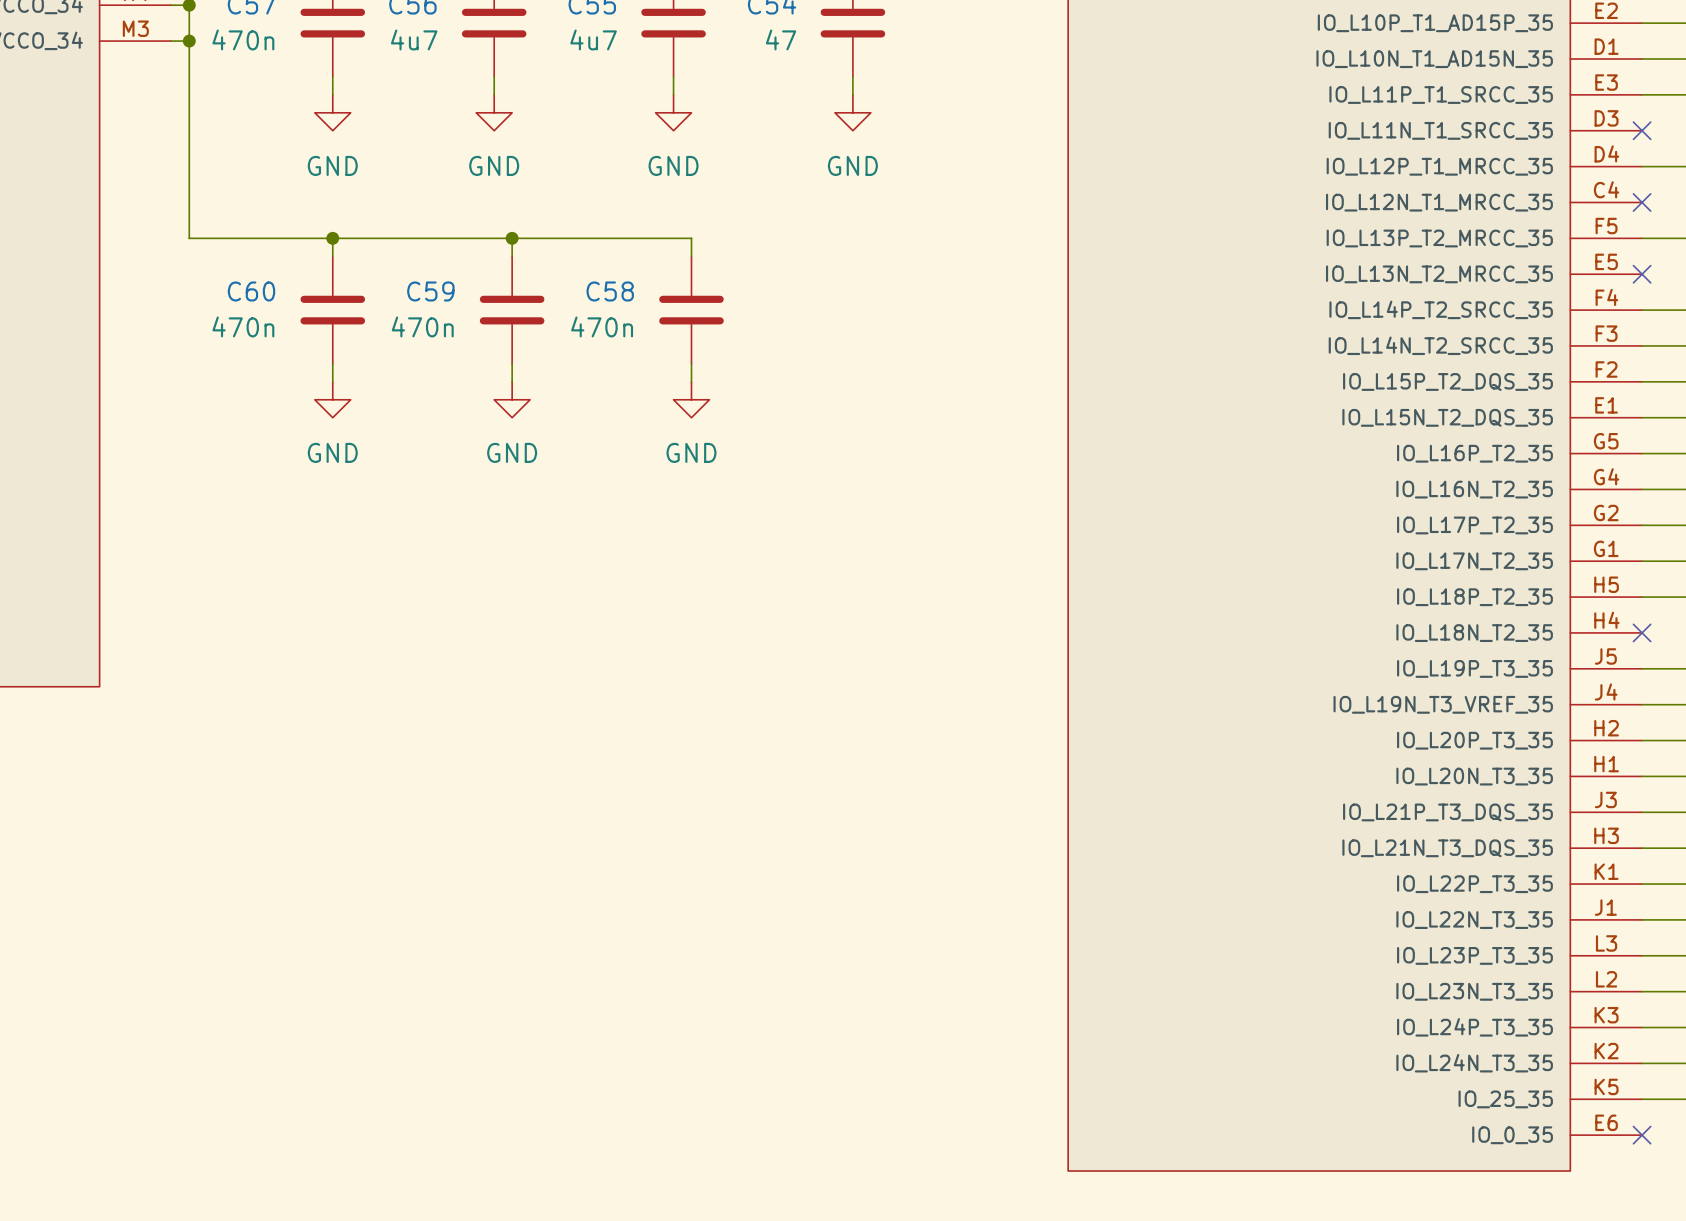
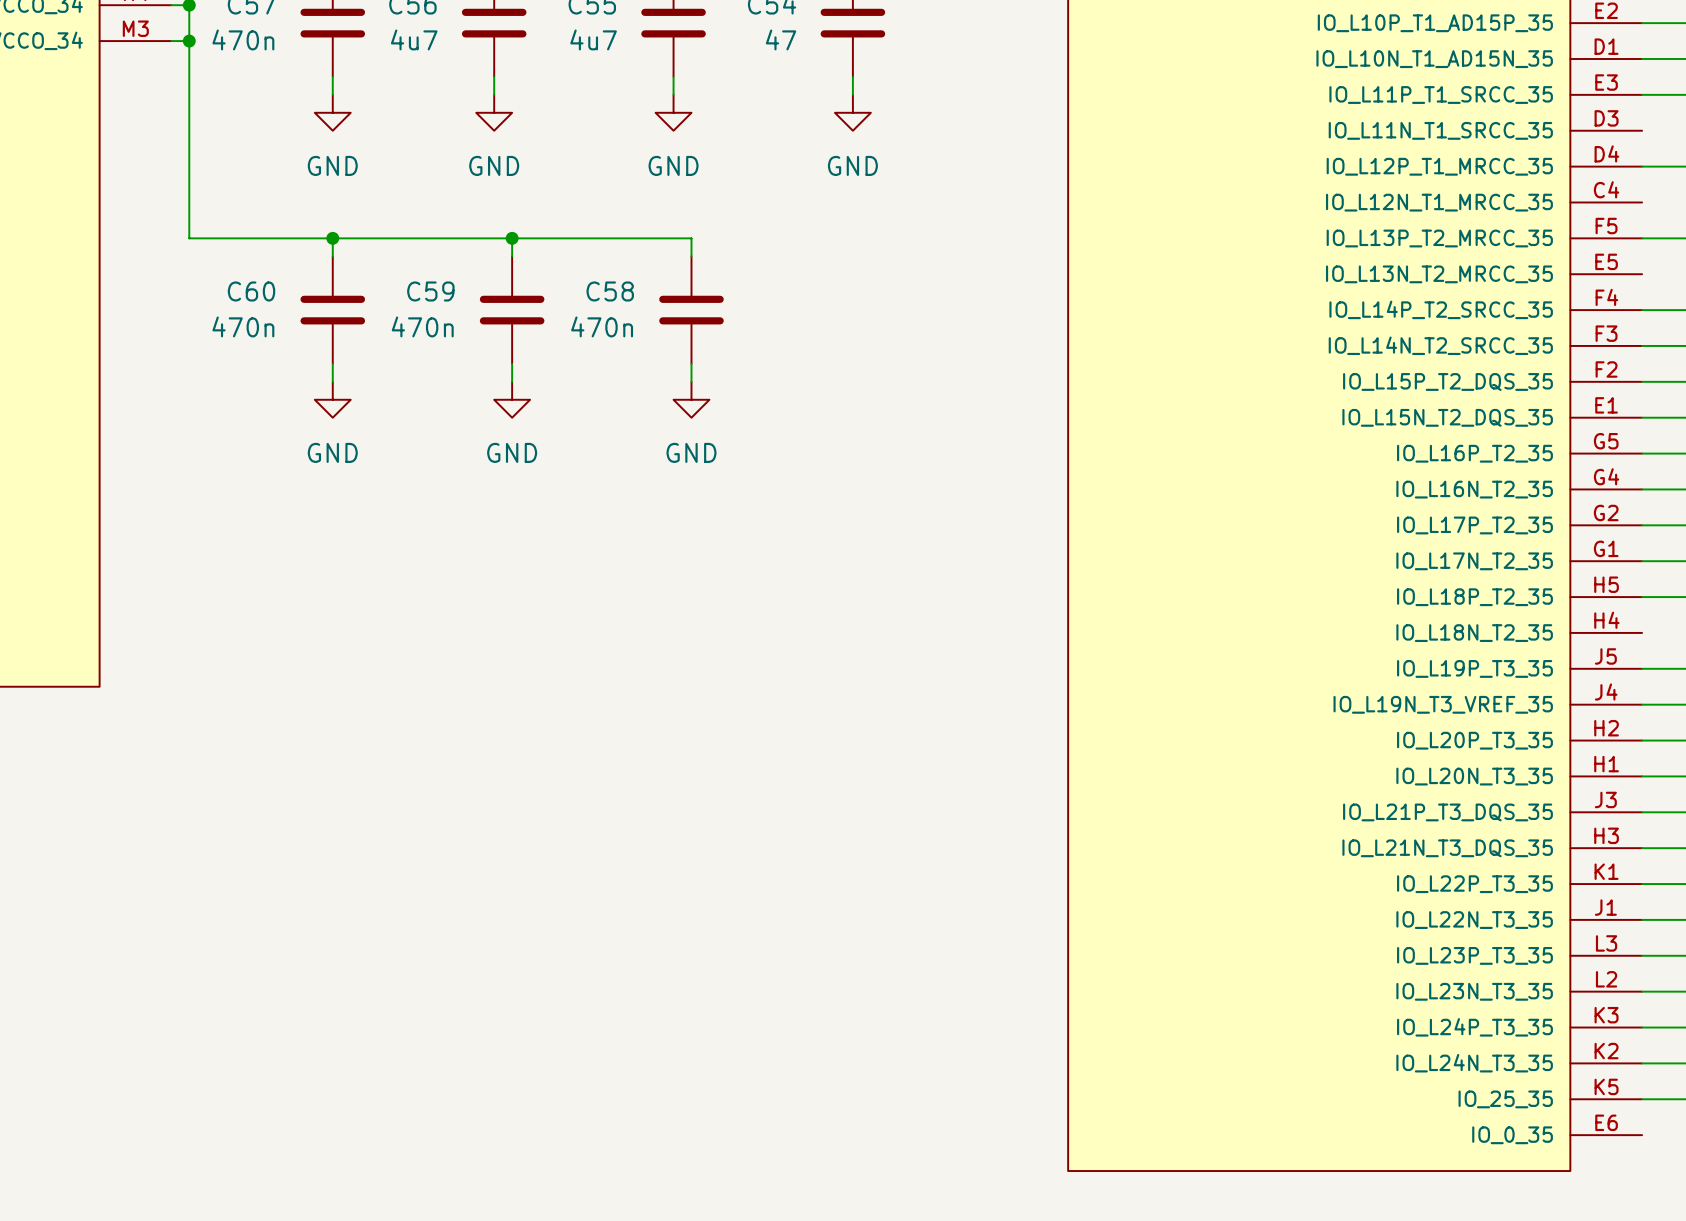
no-connect mark: (1642, 130) -> none
no-connect mark: (1642, 202) -> none
no-connect mark: (1642, 274) -> none
no-connect mark: (1642, 632) -> none
no-connect mark: (1642, 1135) -> none

